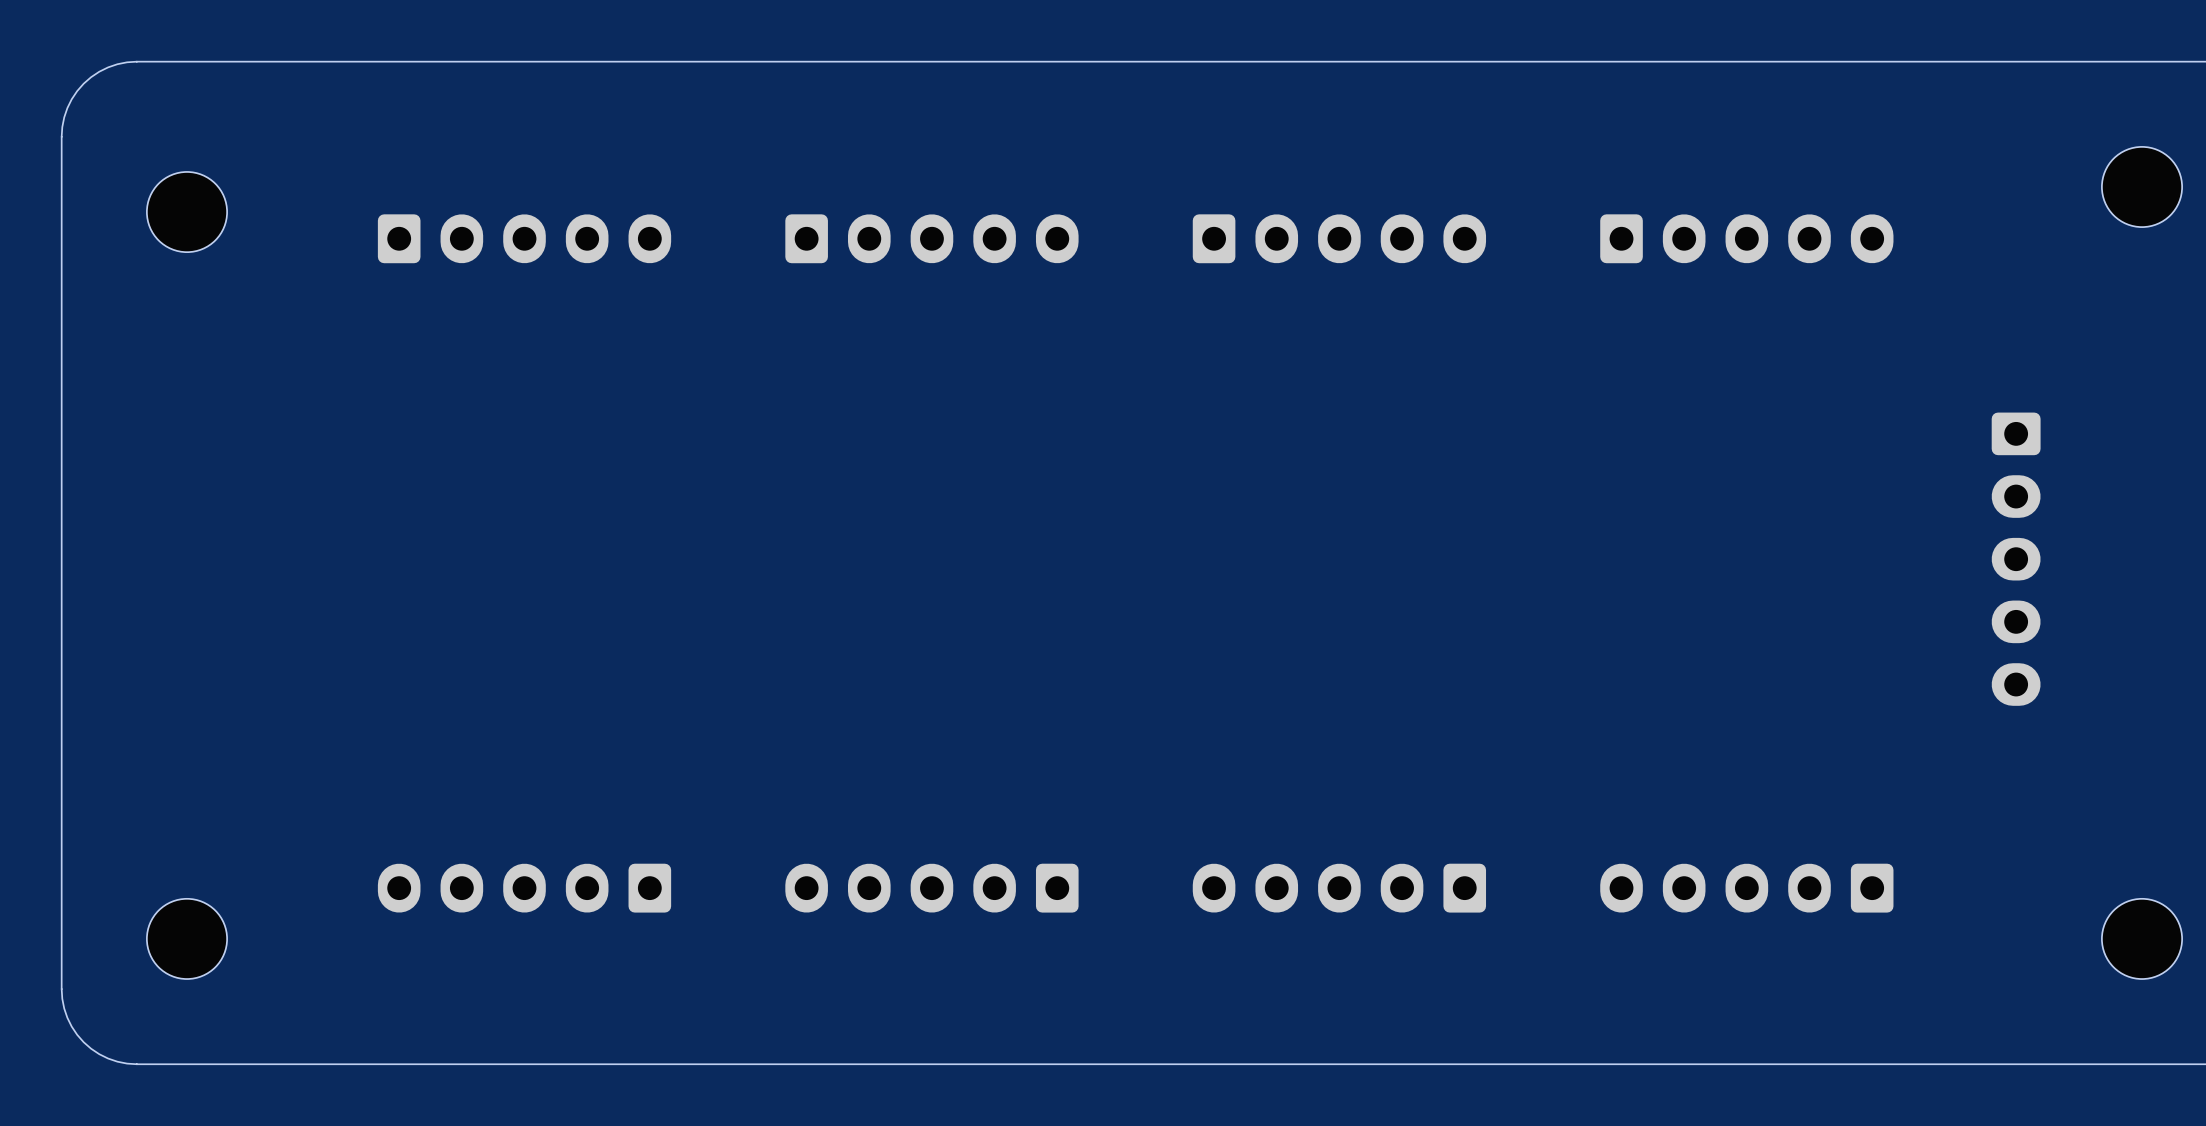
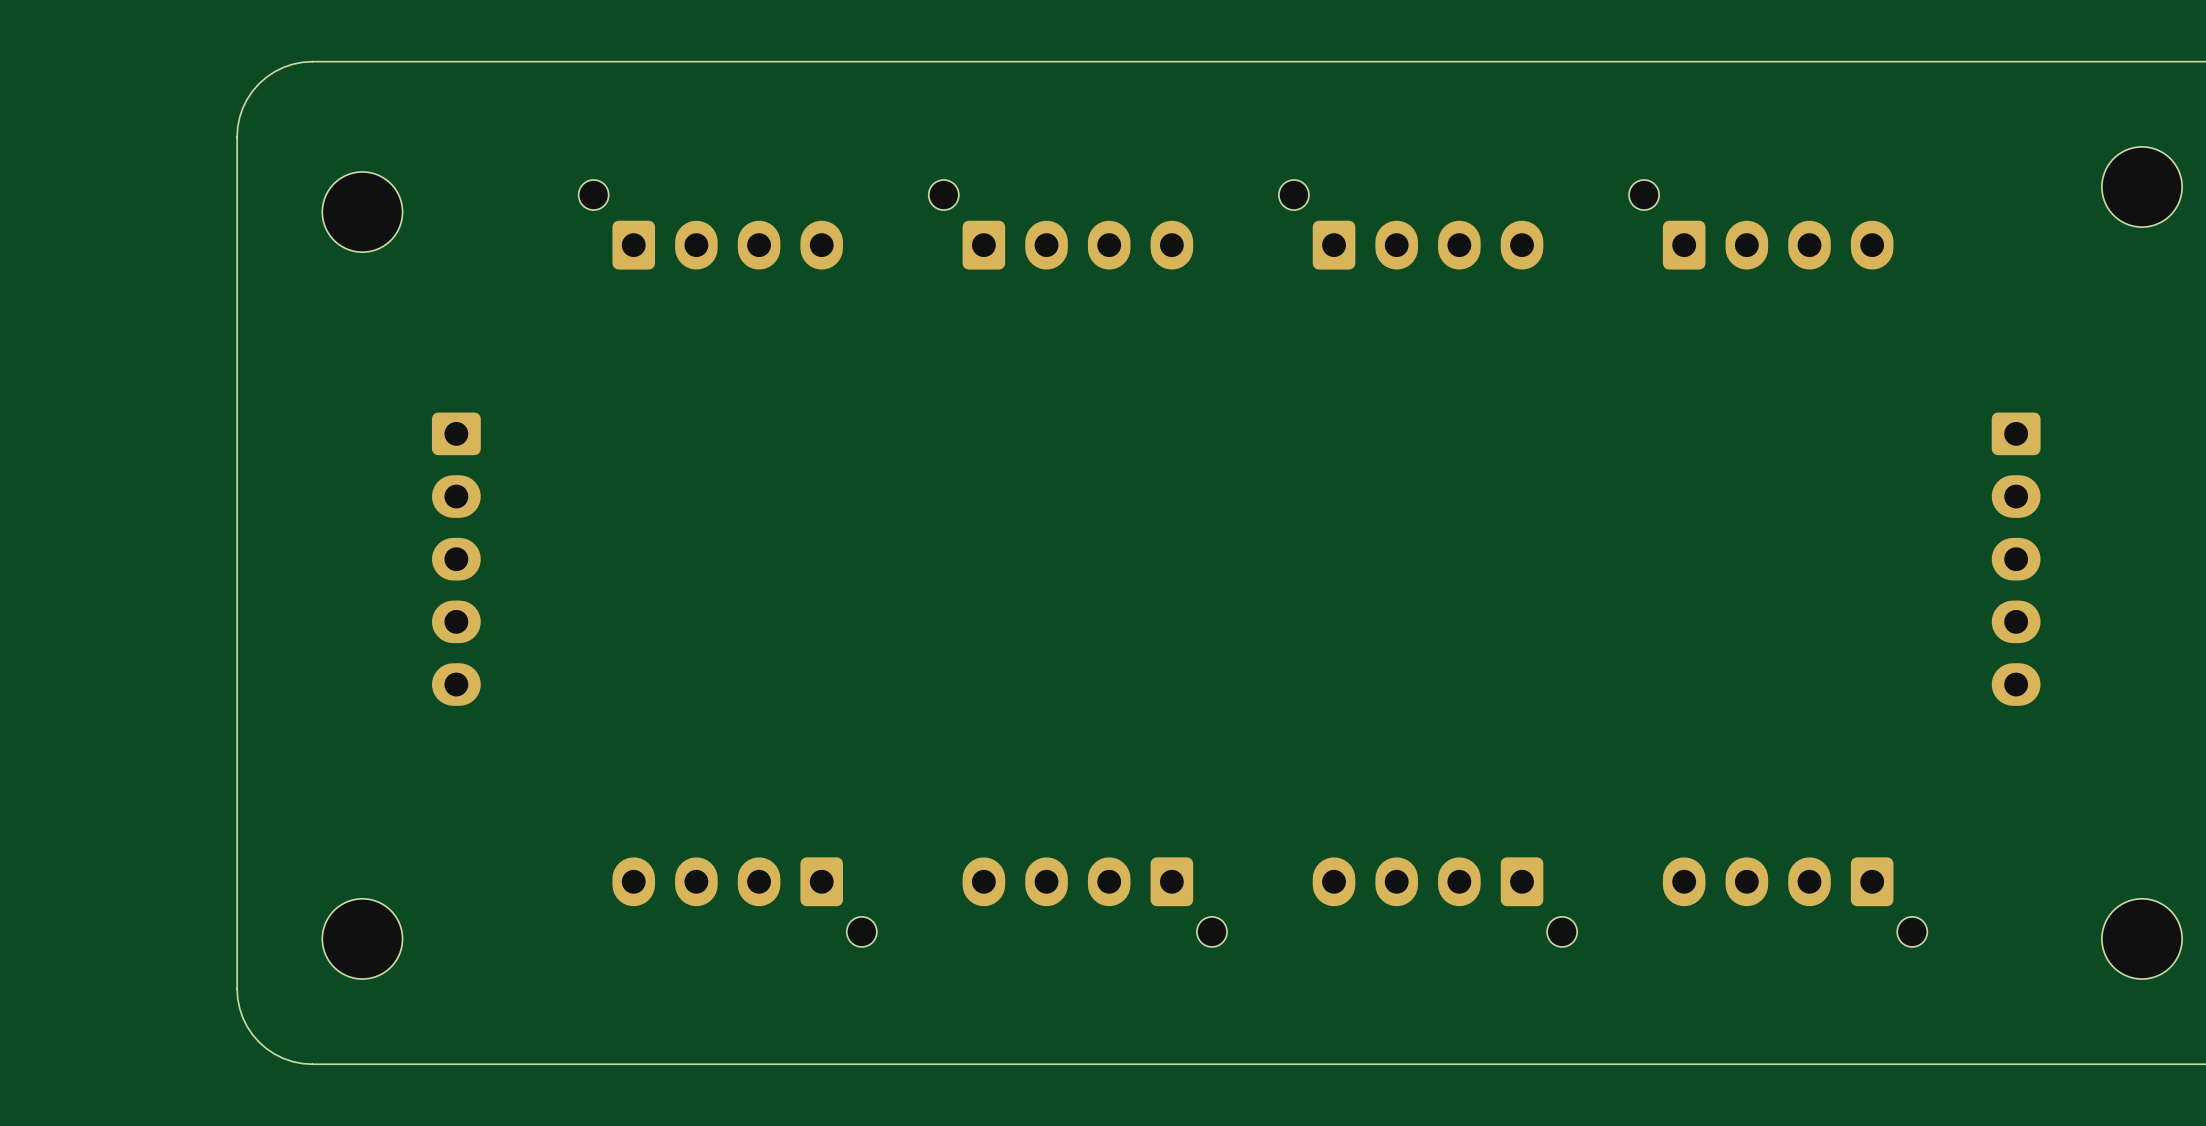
board edge: (312, 61) (136, 61) (117, 64) (99, 71) (77, 91) (67, 108) (61, 136) (61, 989) (64, 1008) (71, 1026) (83, 1042) (99, 1054) (117, 1061) (136, 1064) (312, 1064) -> (312, 61) (283, 67) (259, 83) (242, 108) (237, 136) (237, 998) (242, 1017) (259, 1042) (283, 1058) (312, 1064)
part position: (186, 212) -> (362, 212)
part footprint: [1600, 214, 1894, 264] -> [1629, 179, 1894, 270]
part: none -> (710, 224)
part: none -> (1060, 224)
part: none -> (1411, 224)
part: (524, 238) -> none
part: (931, 238) -> none
part: (1339, 238) -> none
part: none -> (456, 559)
part: (524, 888) -> none
part: (931, 888) -> none
part: (1339, 888) -> none
part: (1746, 888) -> none
part: none -> (744, 902)
part: none -> (1094, 902)
part: none -> (1444, 902)
part: none -> (1795, 902)
part position: (186, 938) -> (362, 938)

